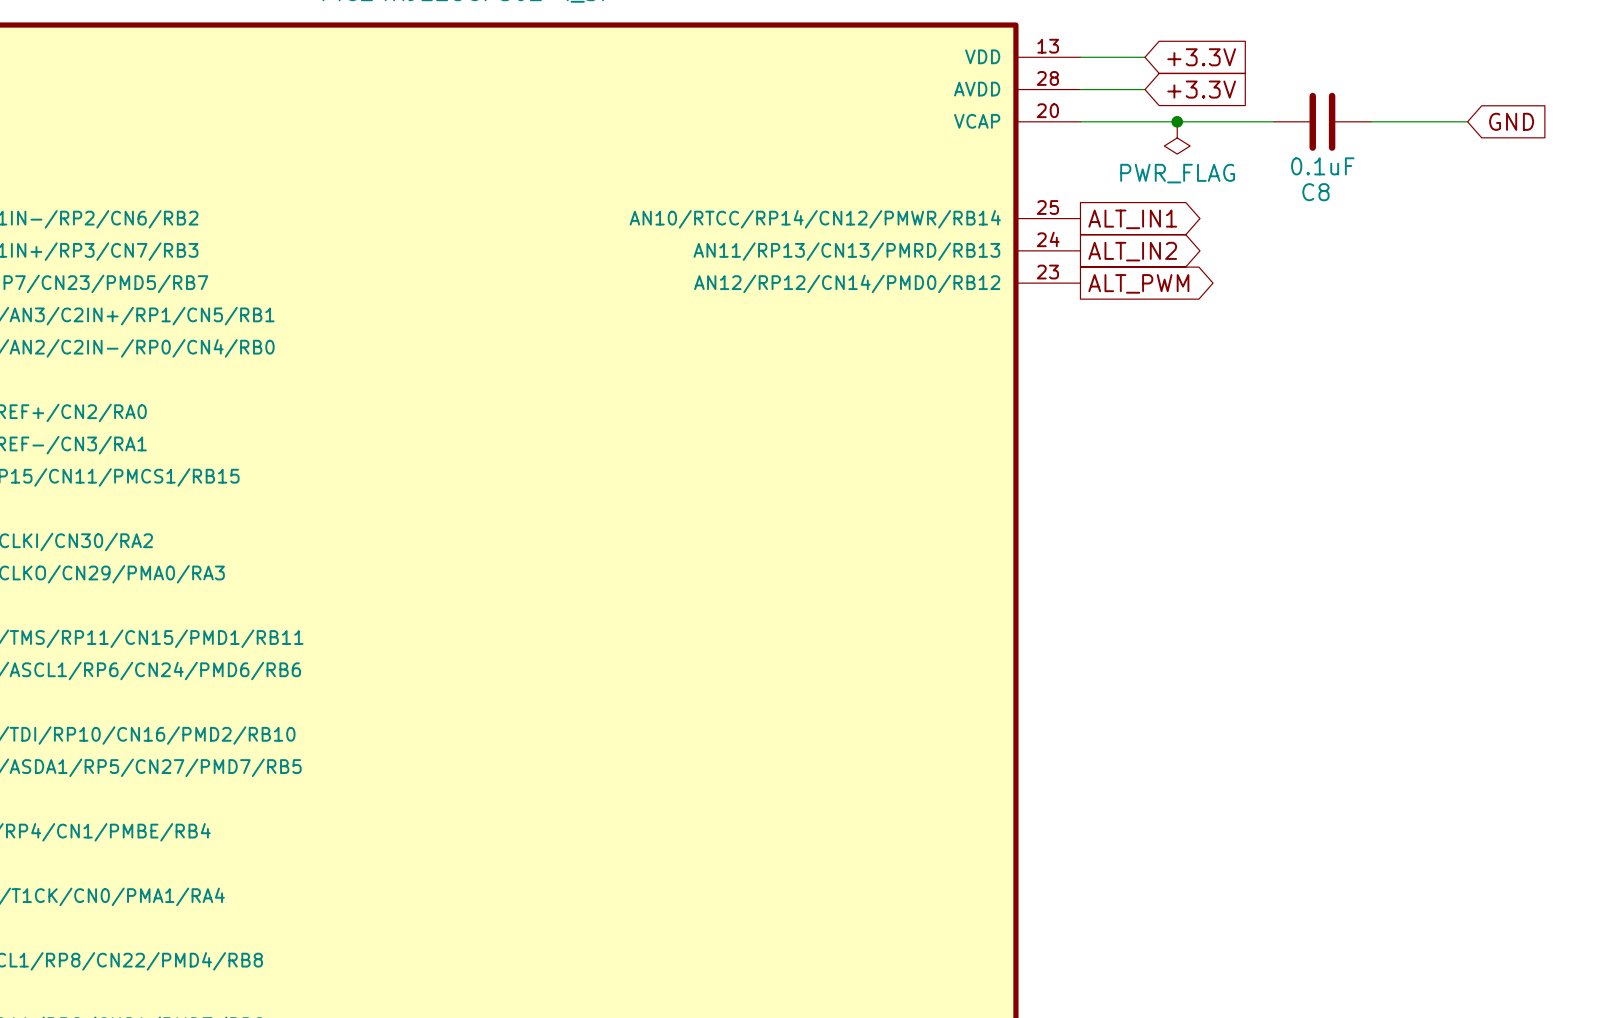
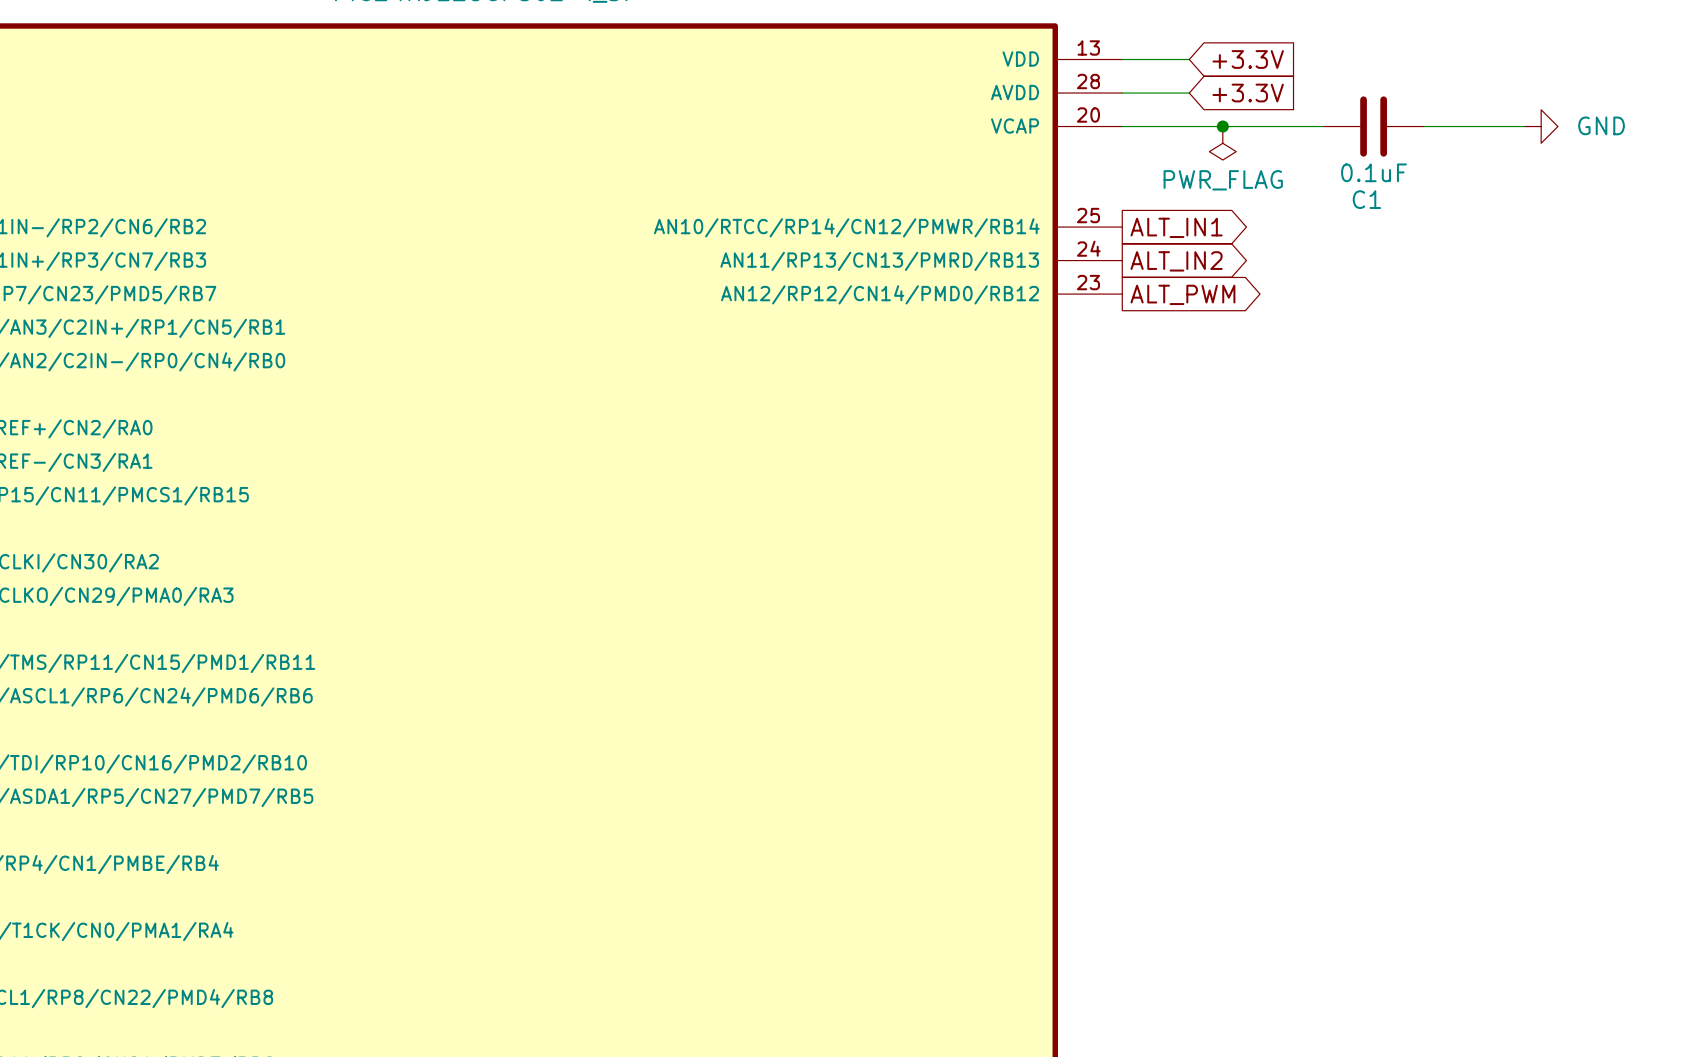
power symbol: none -> GND (1541, 126)
global label: GND (1511, 121) -> none
C8 name: C8 (1315, 192) -> C1 (1366, 199)

